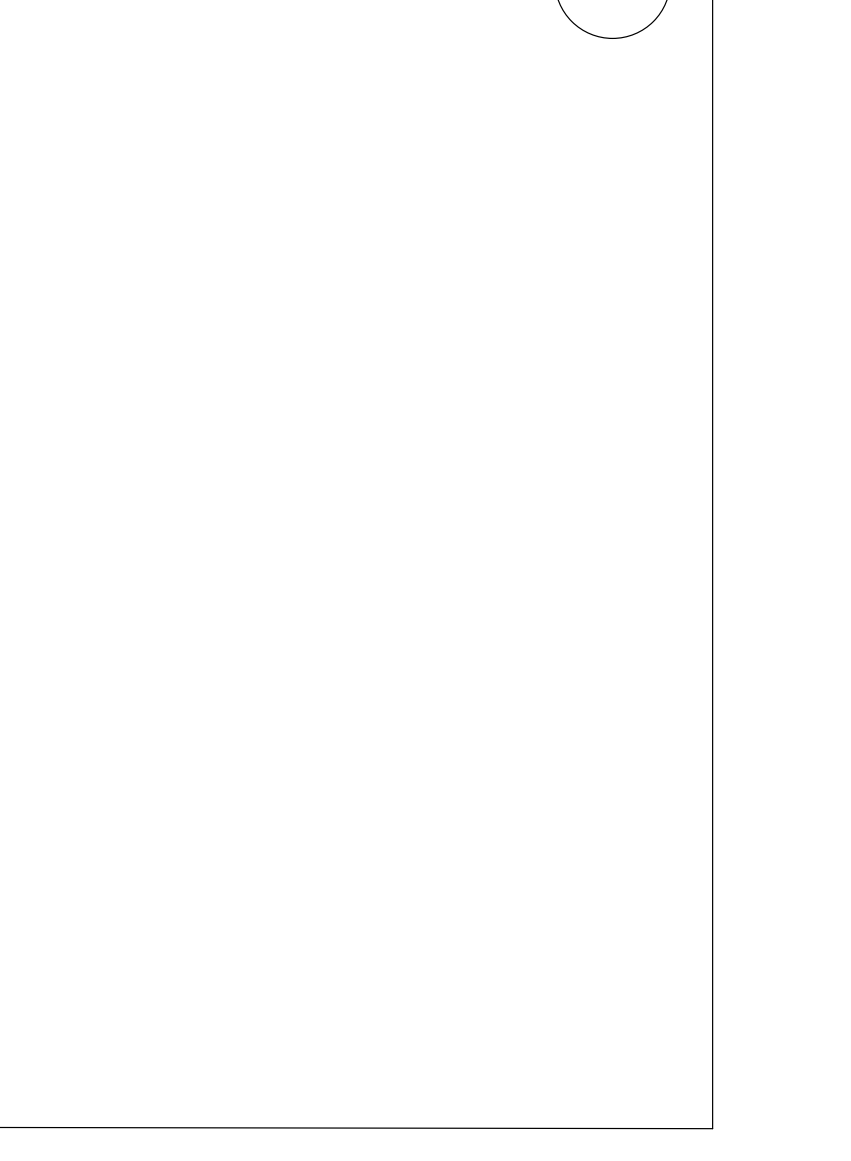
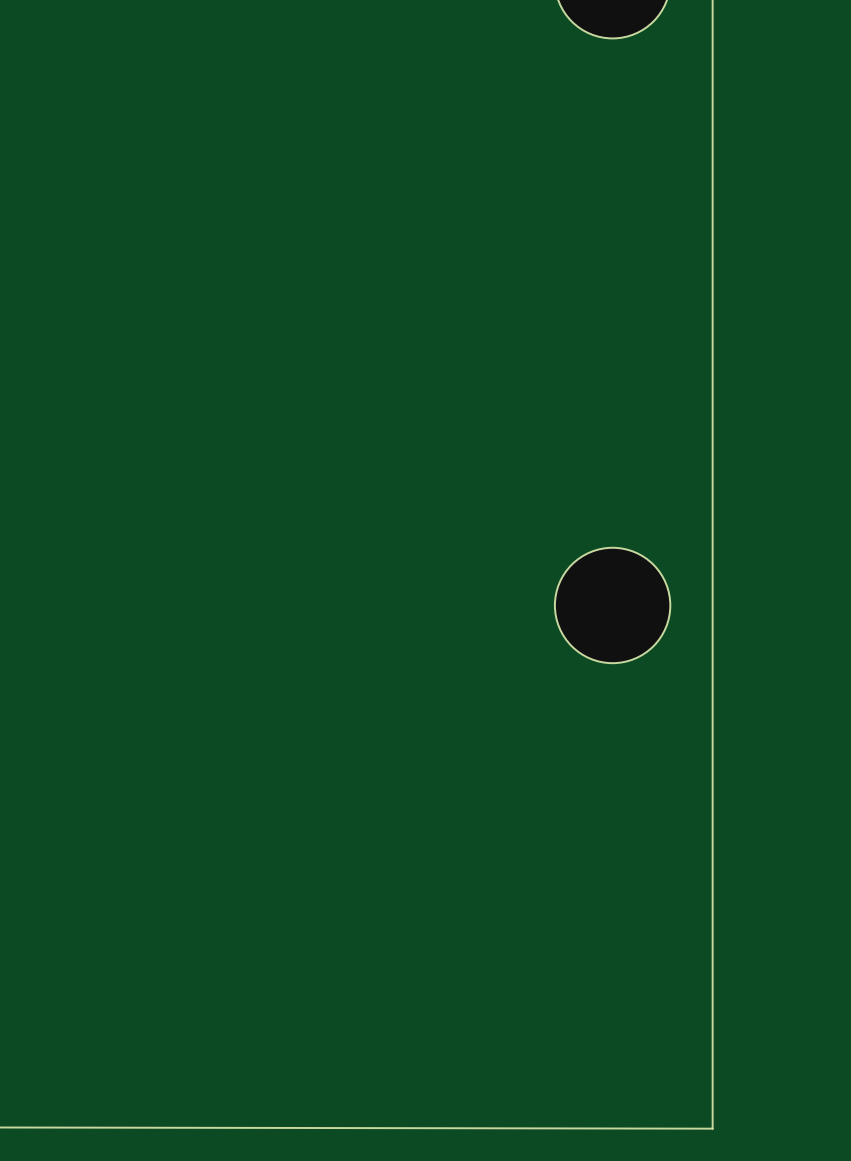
part: none -> (612, 605)

